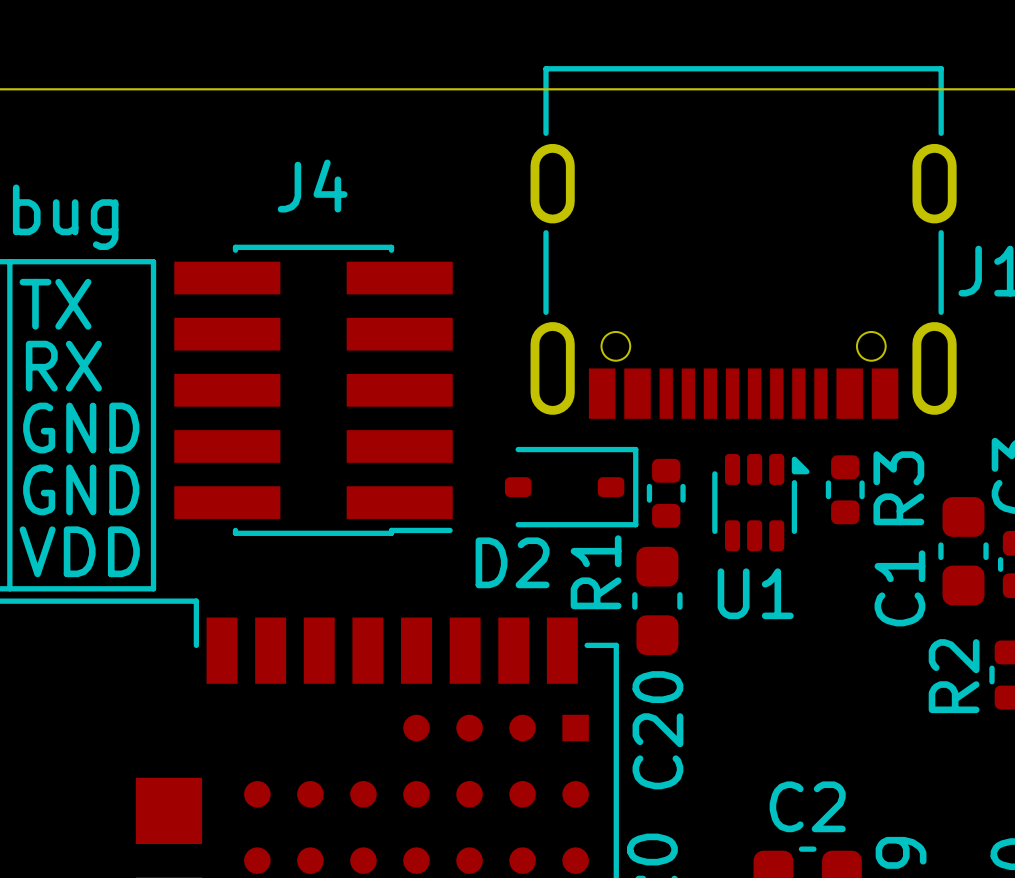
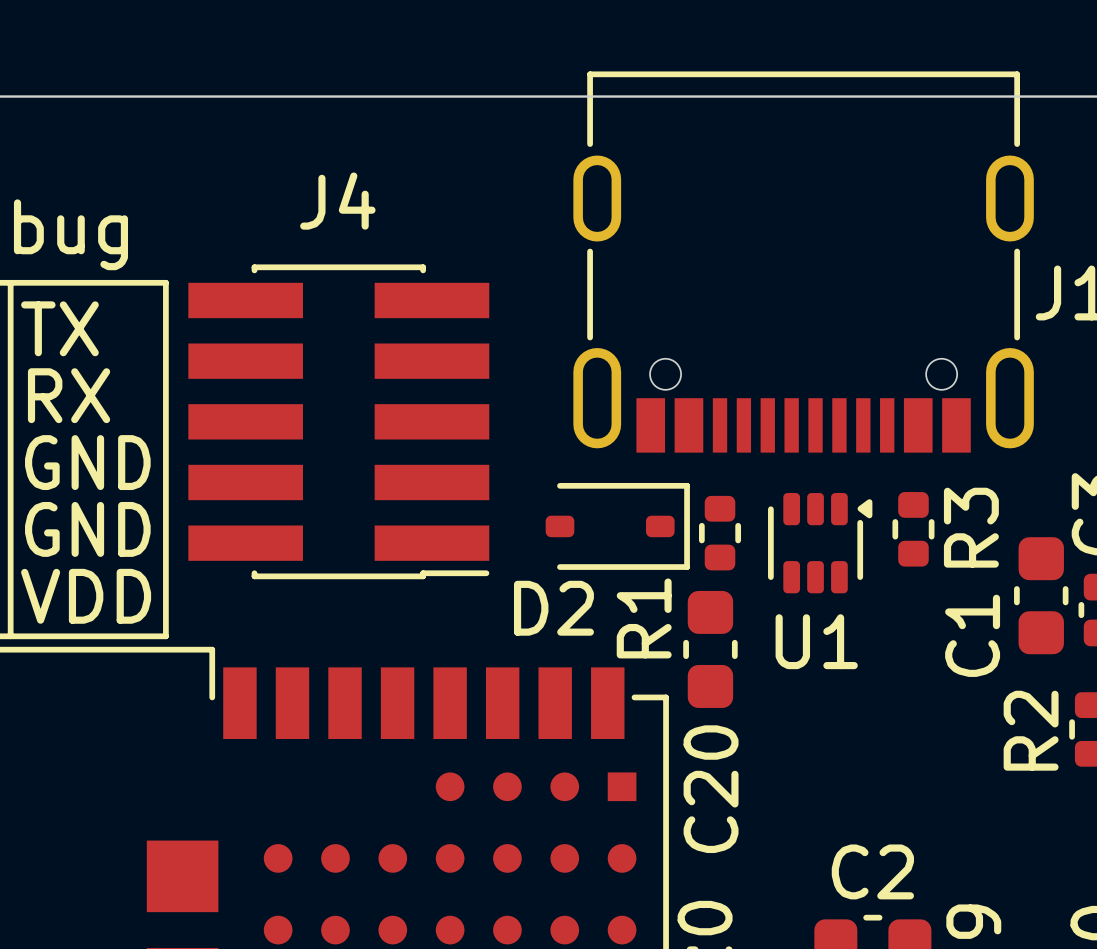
U1 footprint: [712, 453, 810, 552] -> [768, 493, 873, 594]

